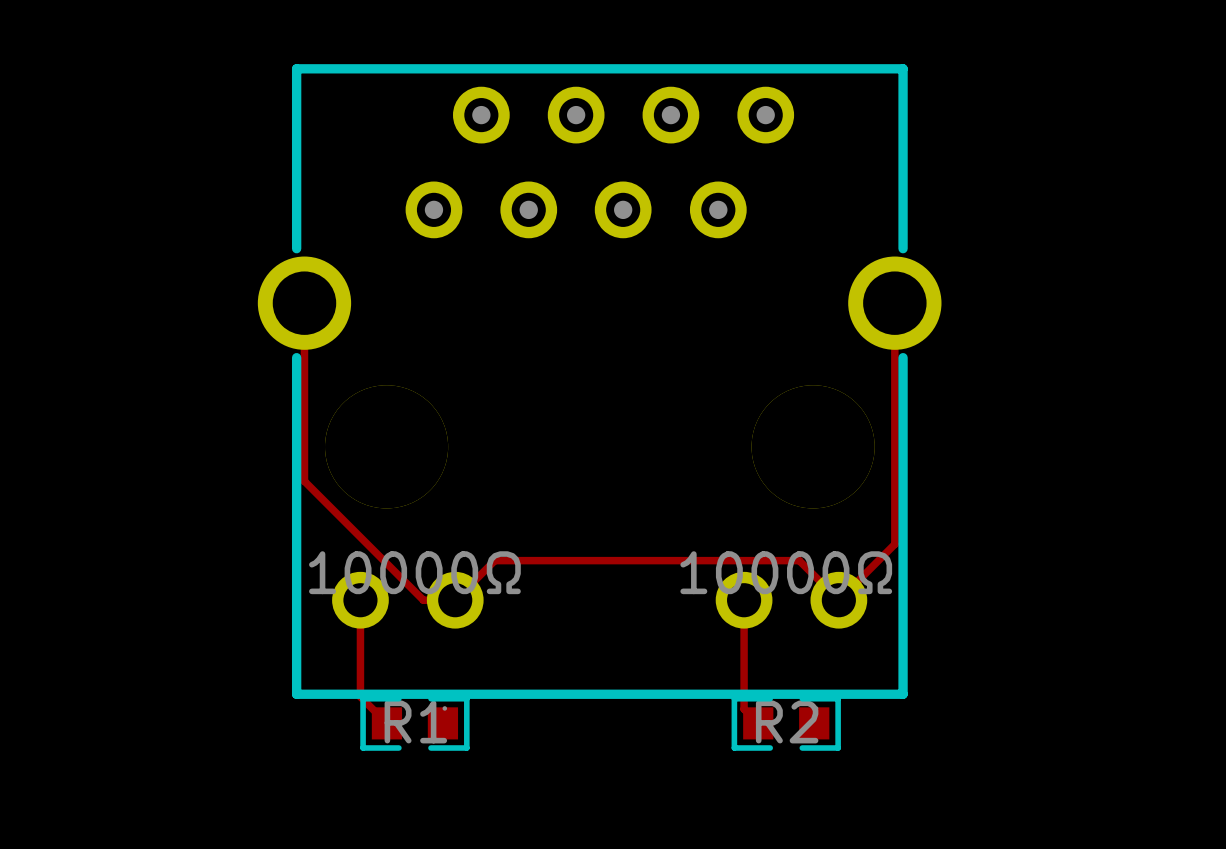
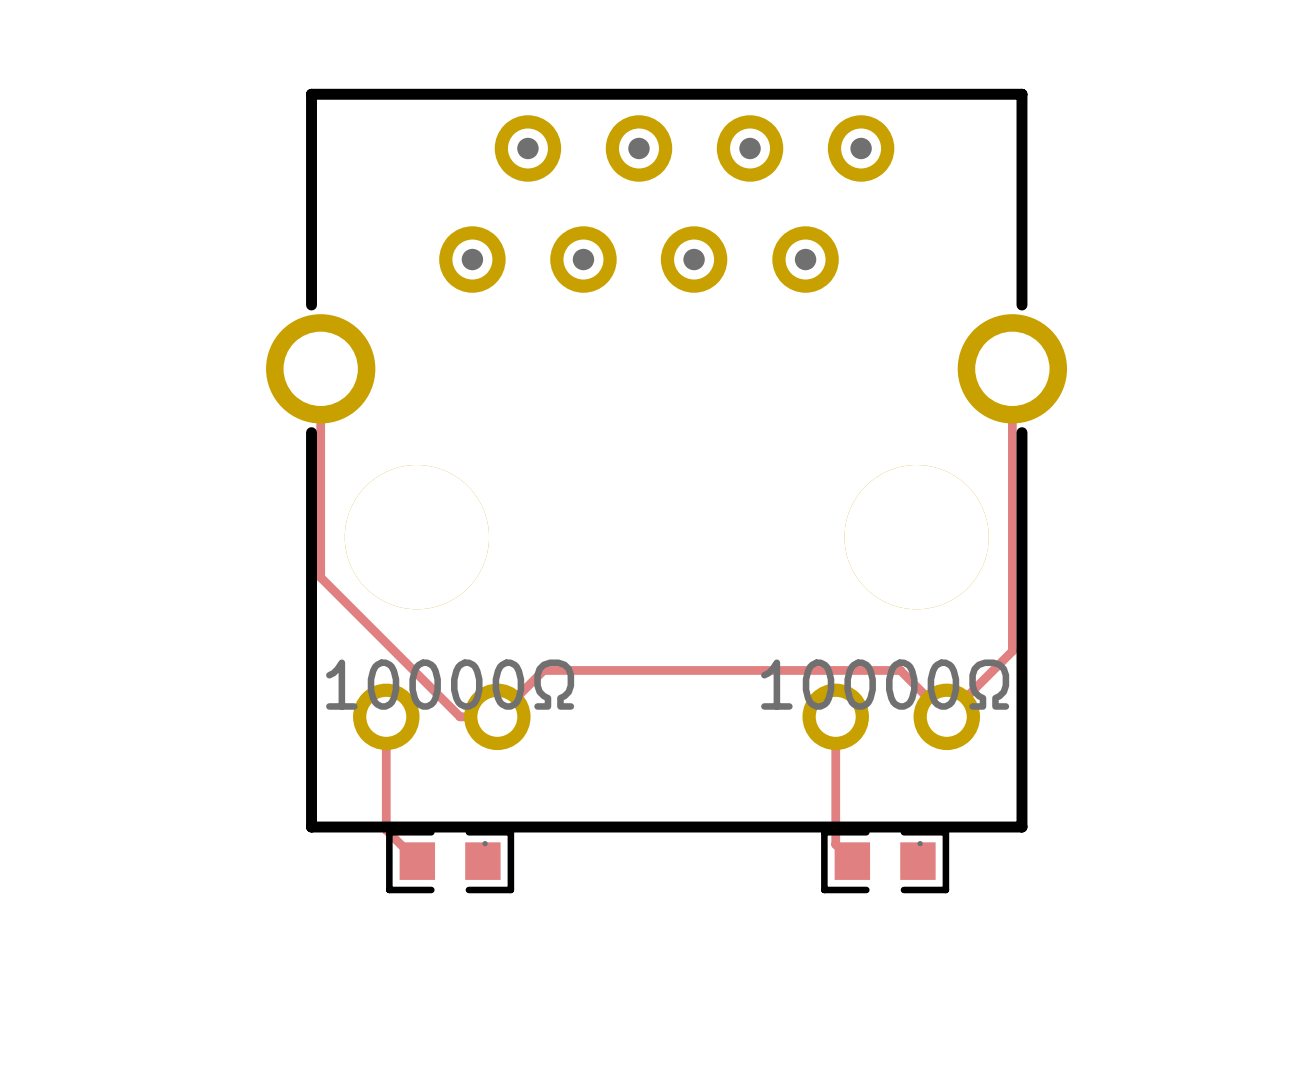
R1 name: R1 (415, 721) -> none
R2 name: R2 (787, 721) -> none

